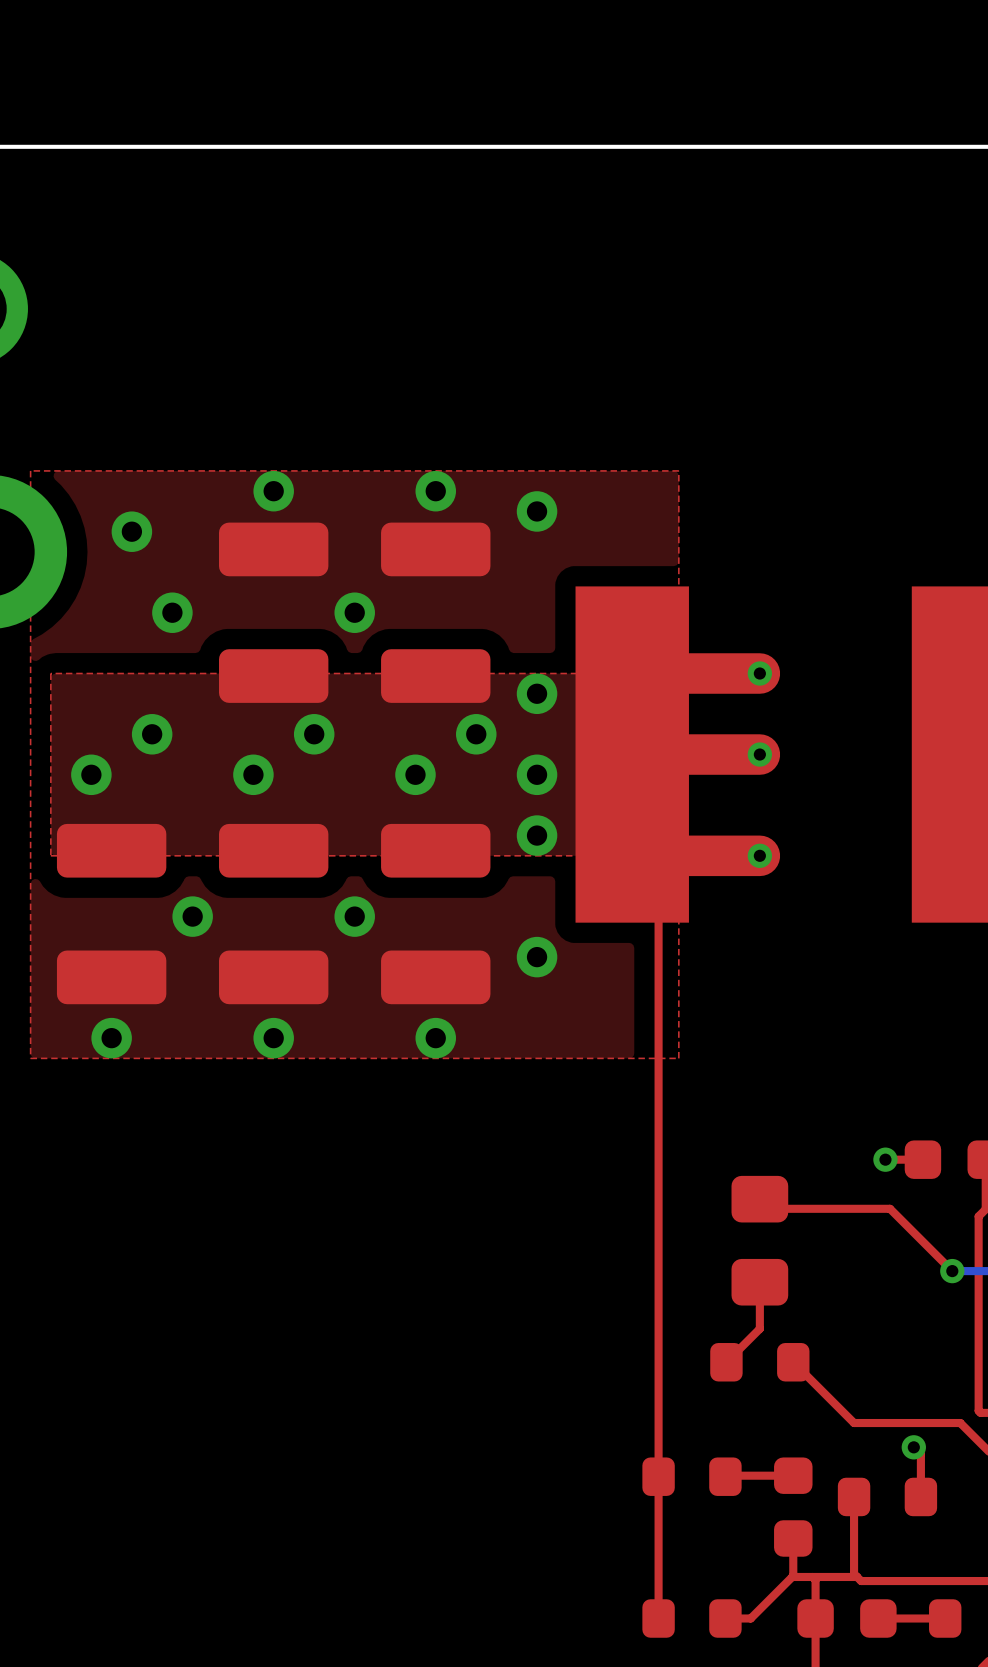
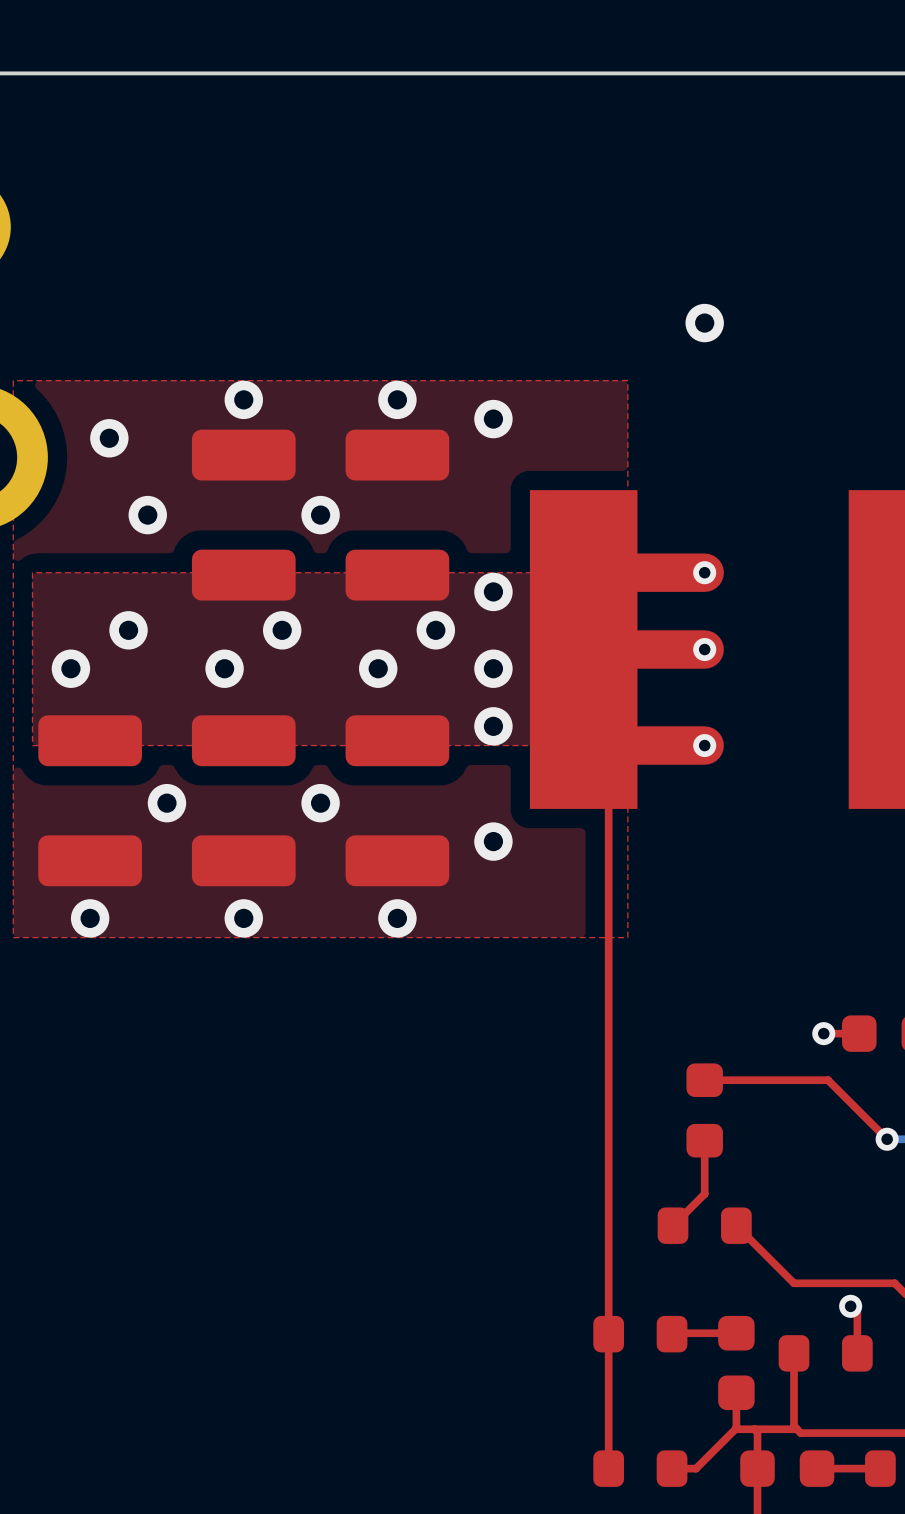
via: none -> (704, 323)
part footprint: [731, 1175, 789, 1306] -> [686, 1063, 723, 1158]

